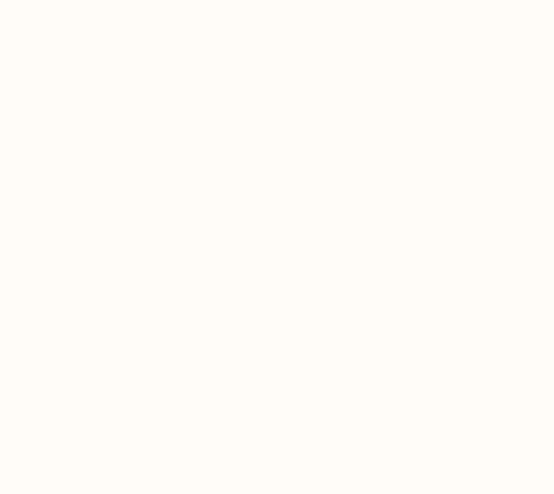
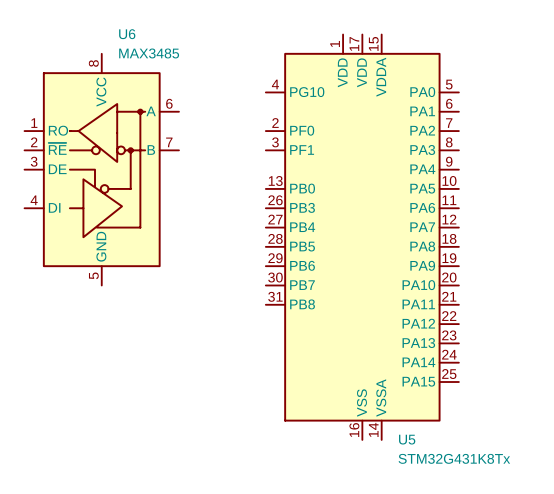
U6: none -> MAX3485 (101, 169)
U5: none -> STM32G431K8Tx (362, 237)

